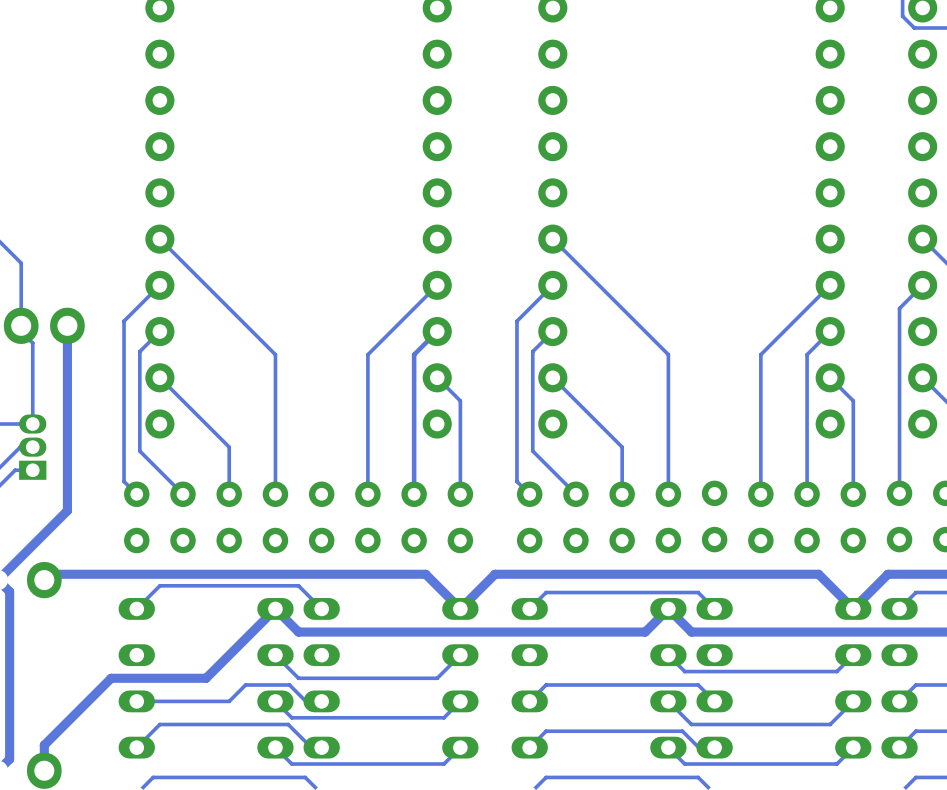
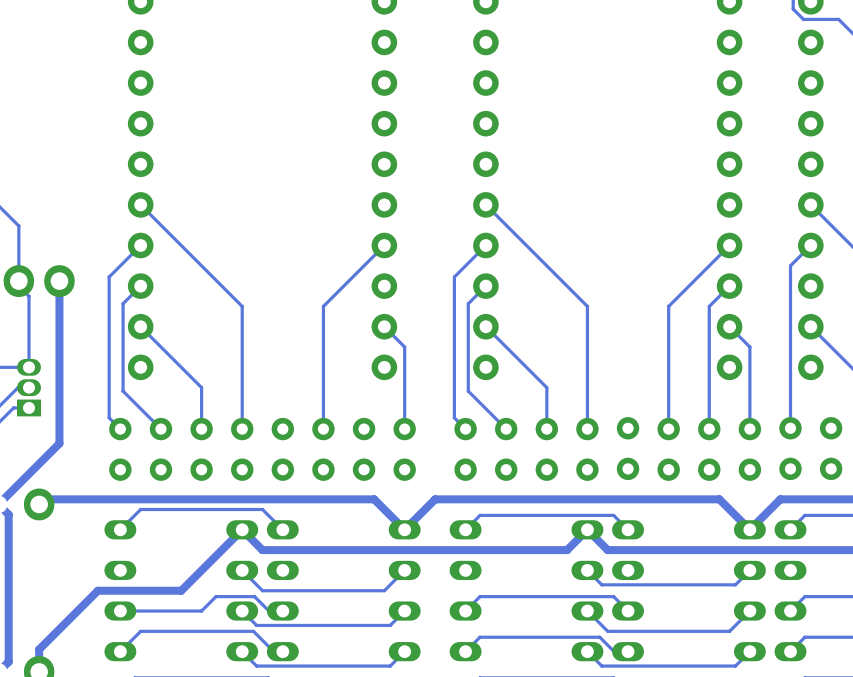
track: (437, 331) (414, 354) (414, 494) -> none

